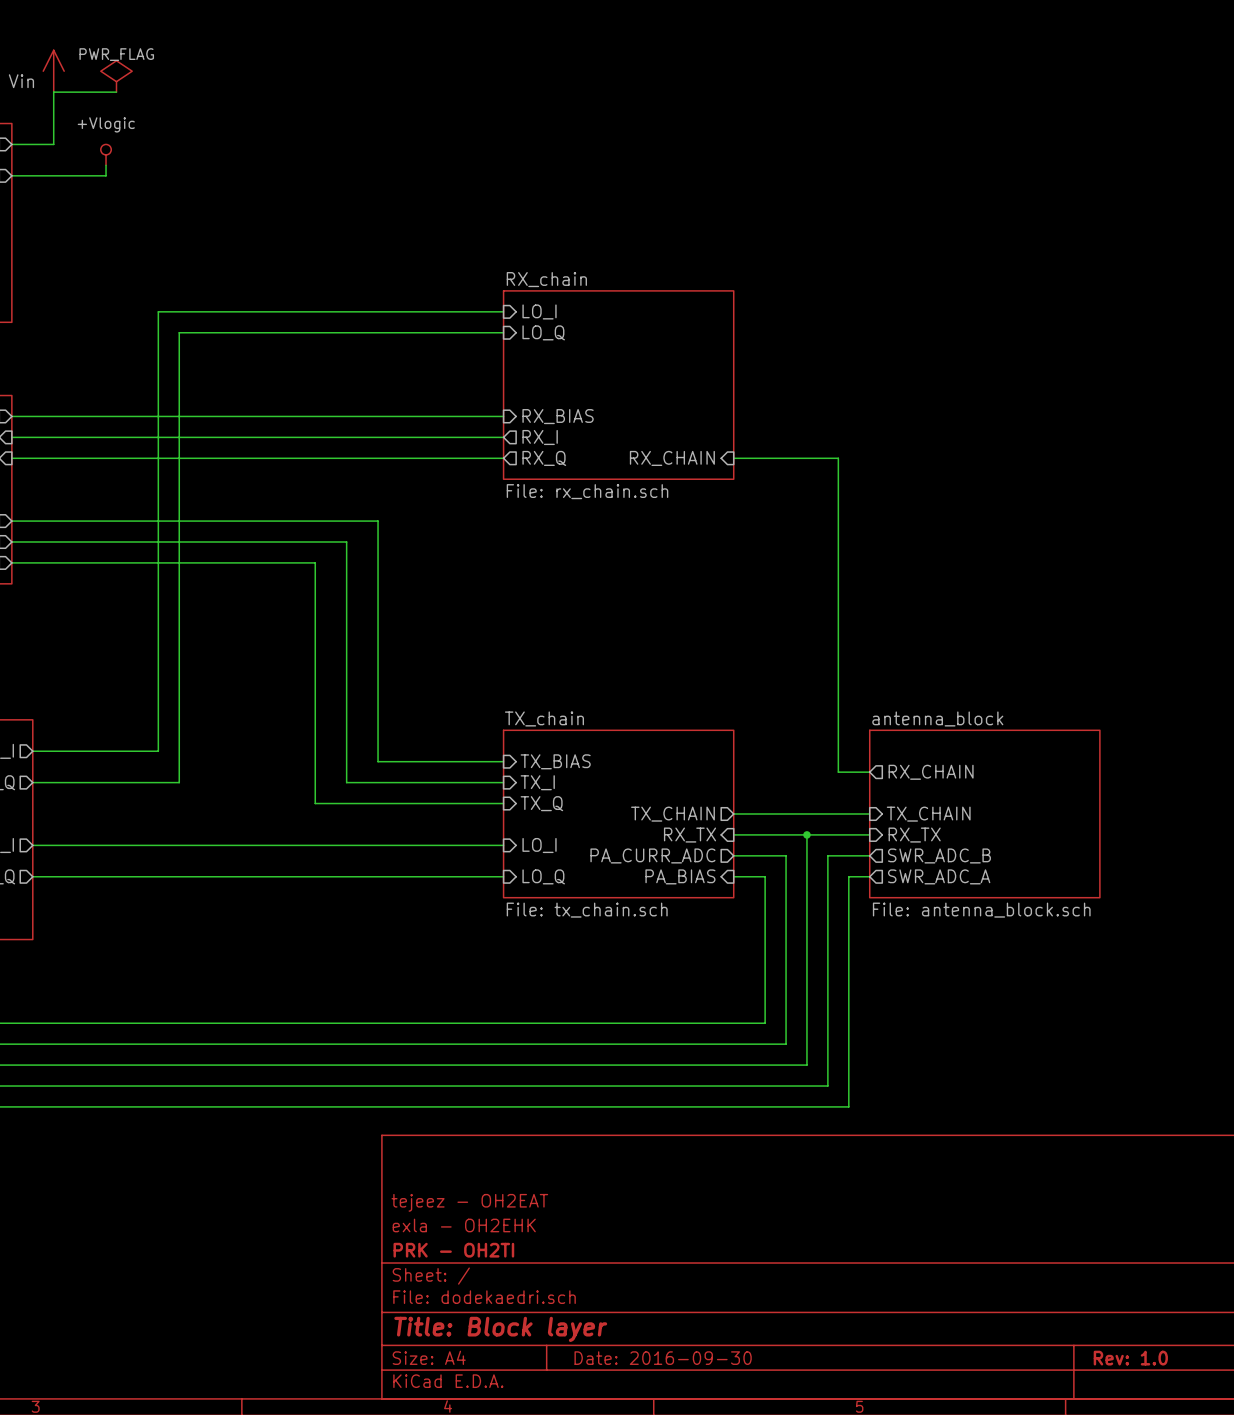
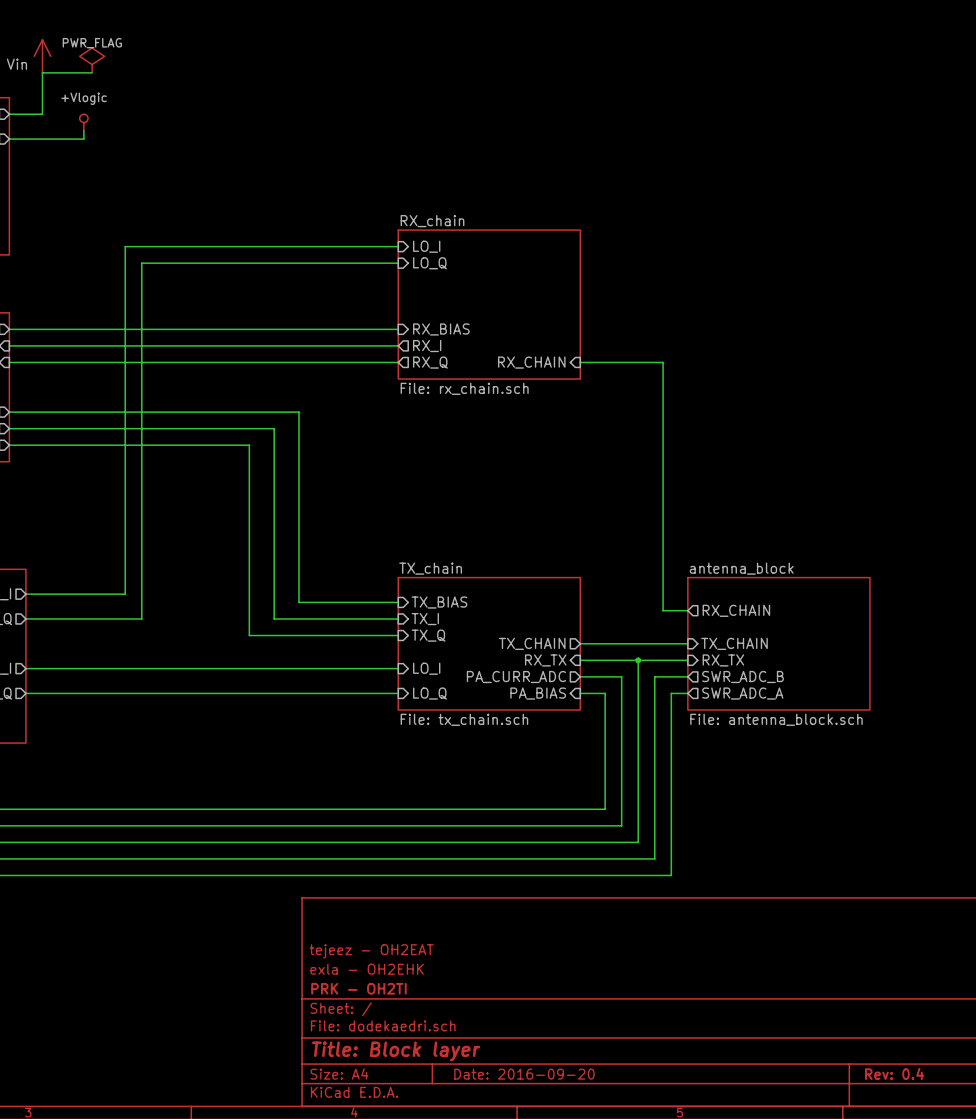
title block: Date: 2016-09-30 (663, 1358) -> Date: 2016-09-20 (524, 1074)
title block: Rev: 1.0 (1130, 1358) -> Rev: 0.4 (894, 1073)

